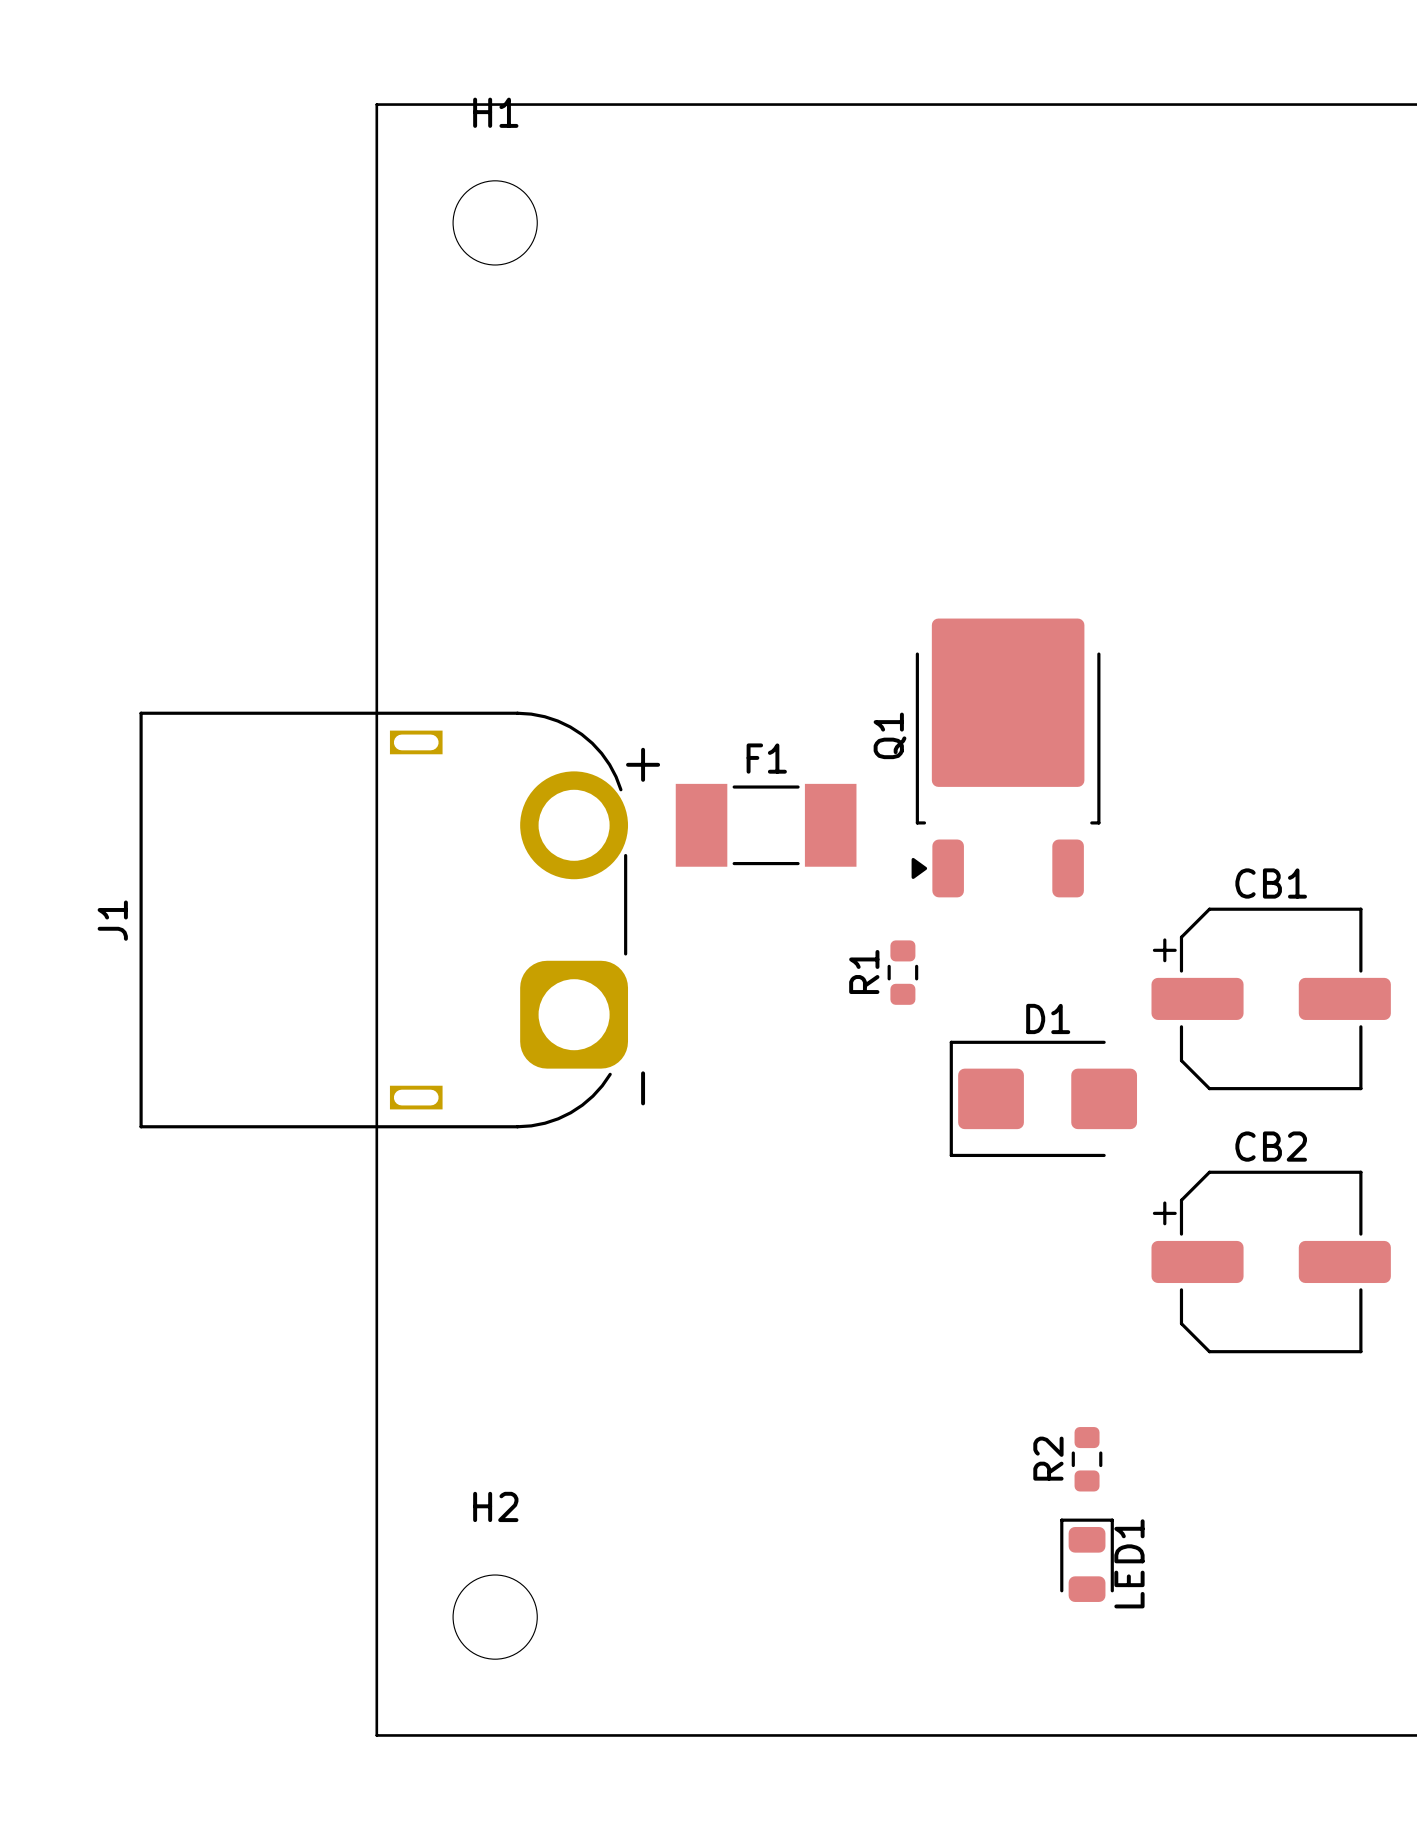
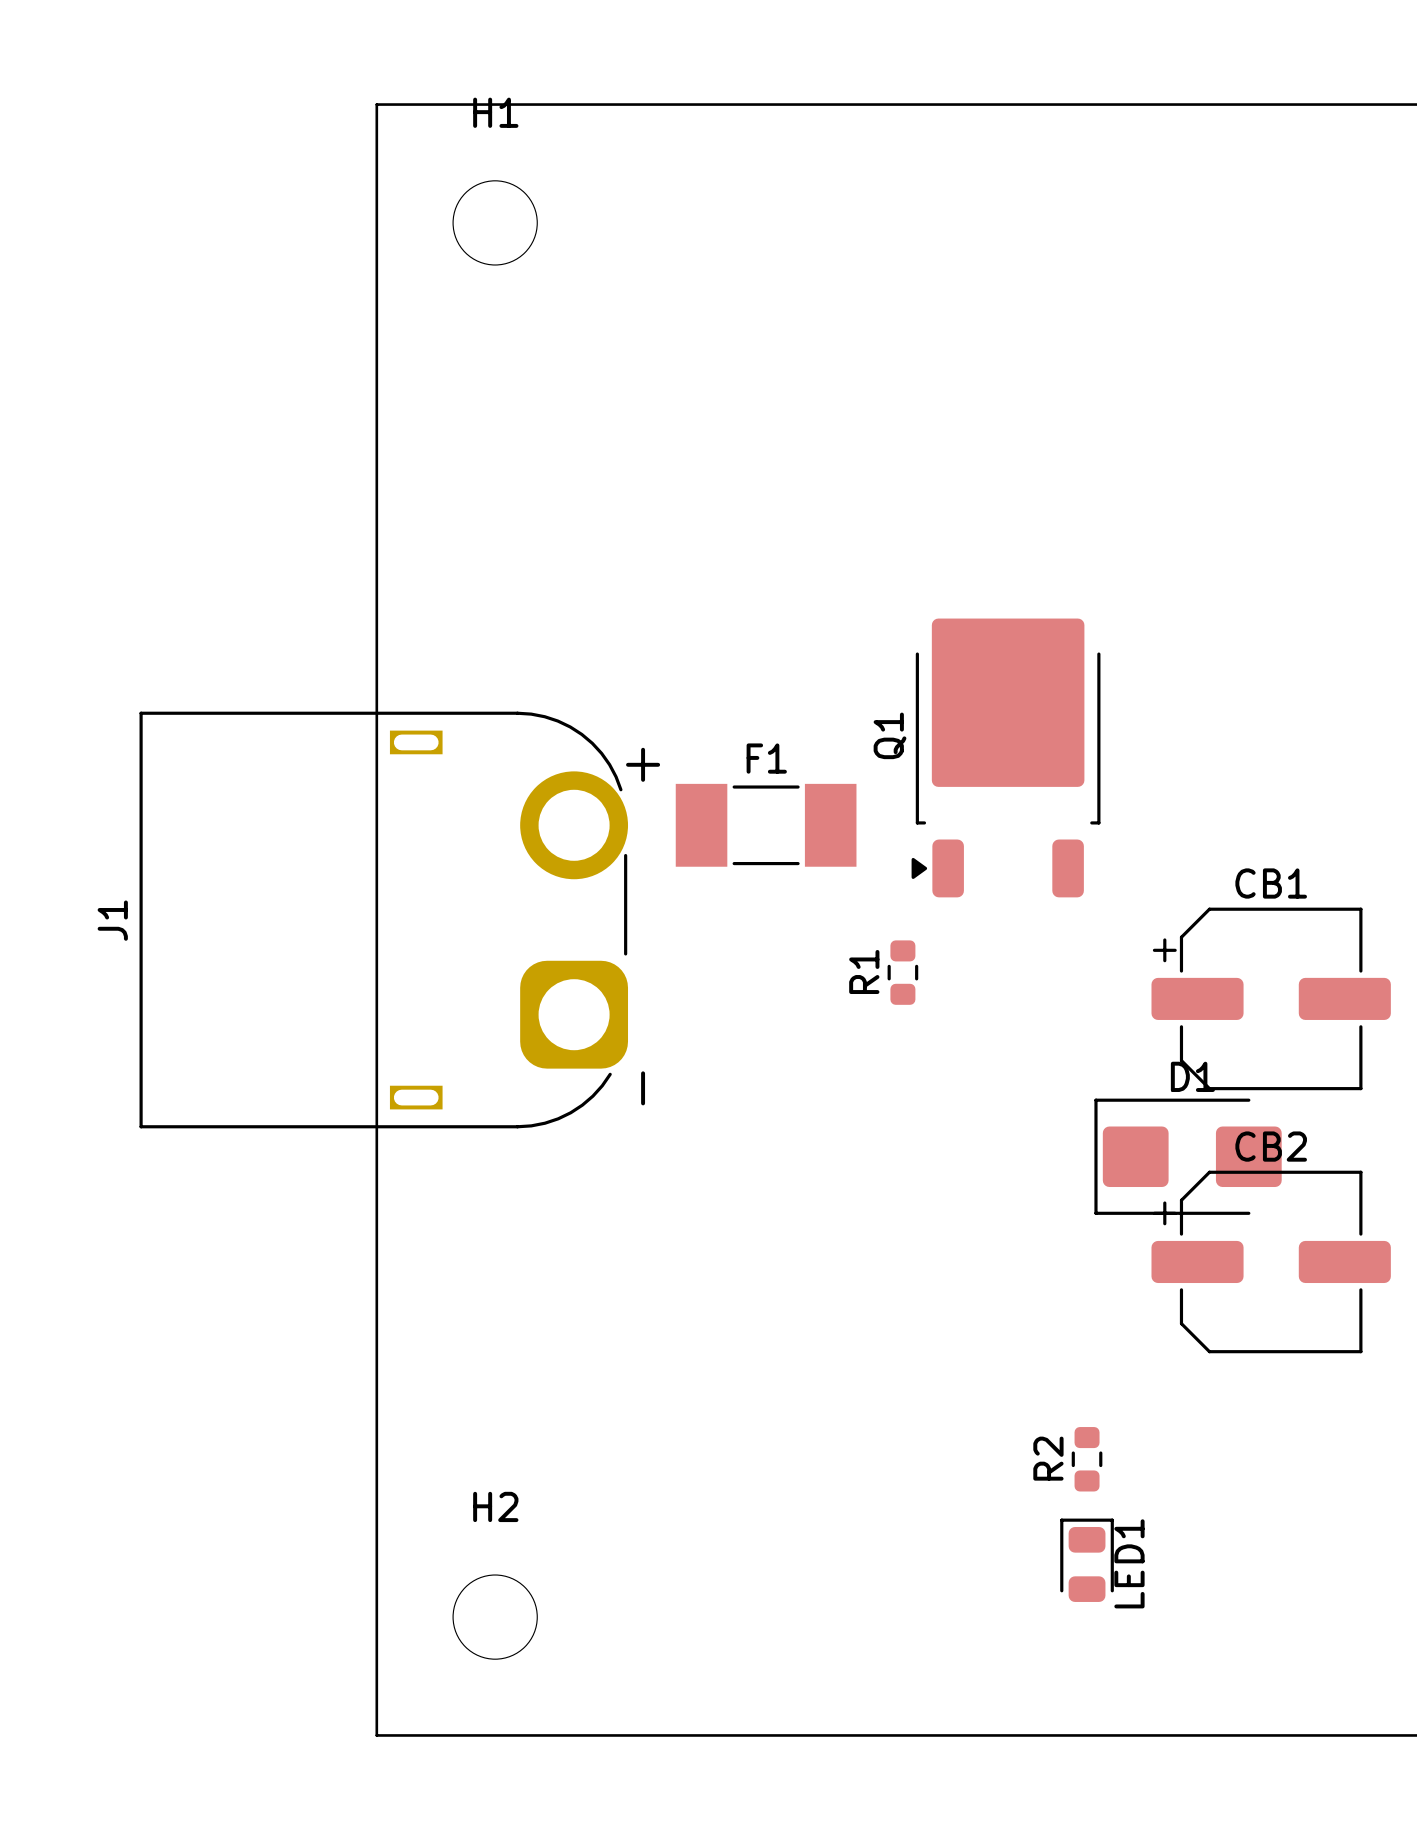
D1 position: (1043, 1098) -> (1188, 1156)

